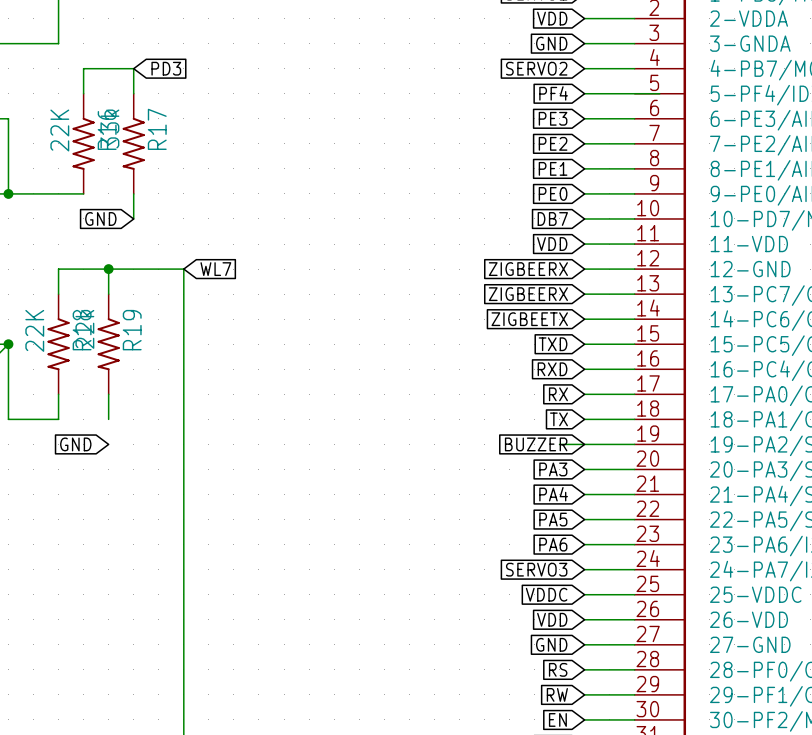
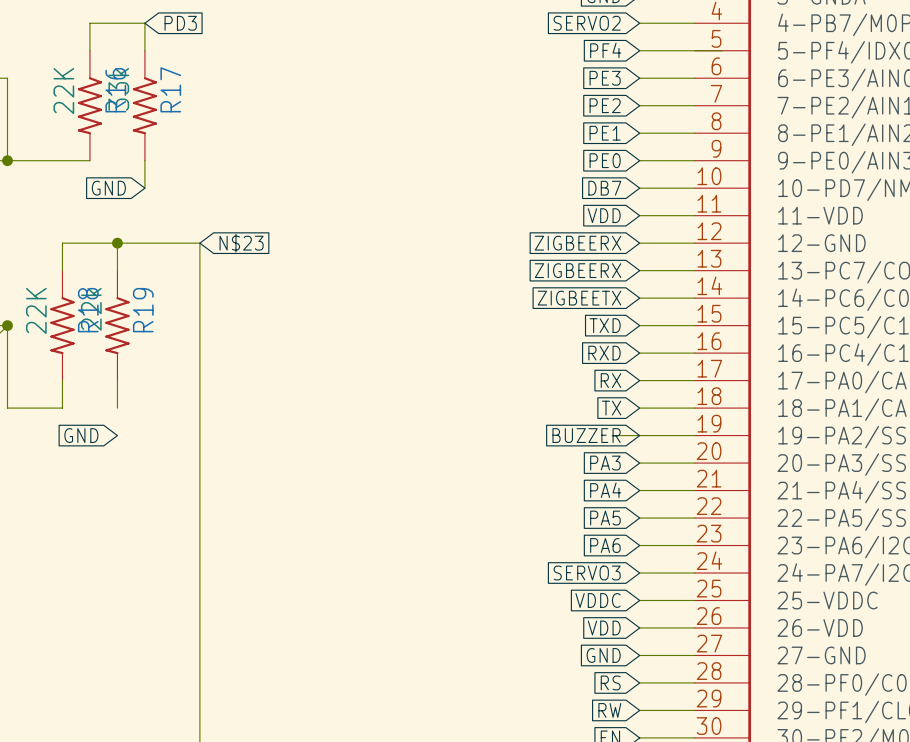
global label: WL7 (215, 269) -> N$23 (241, 243)

